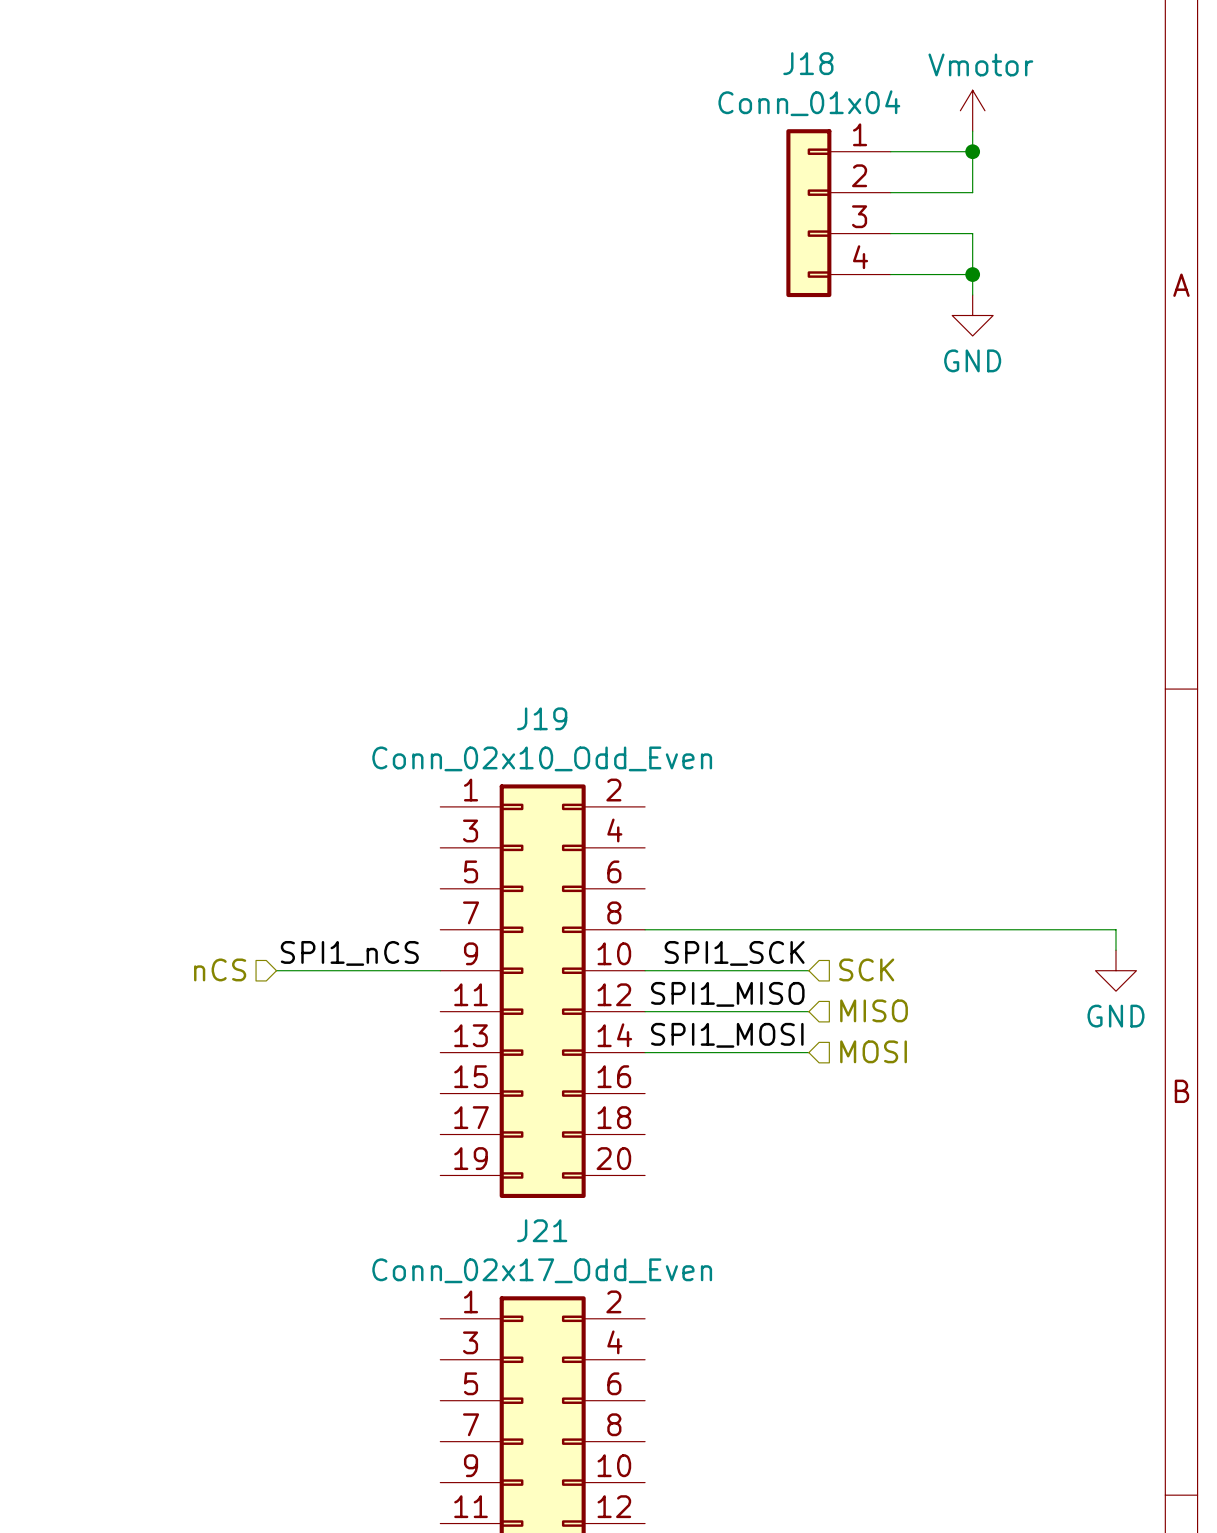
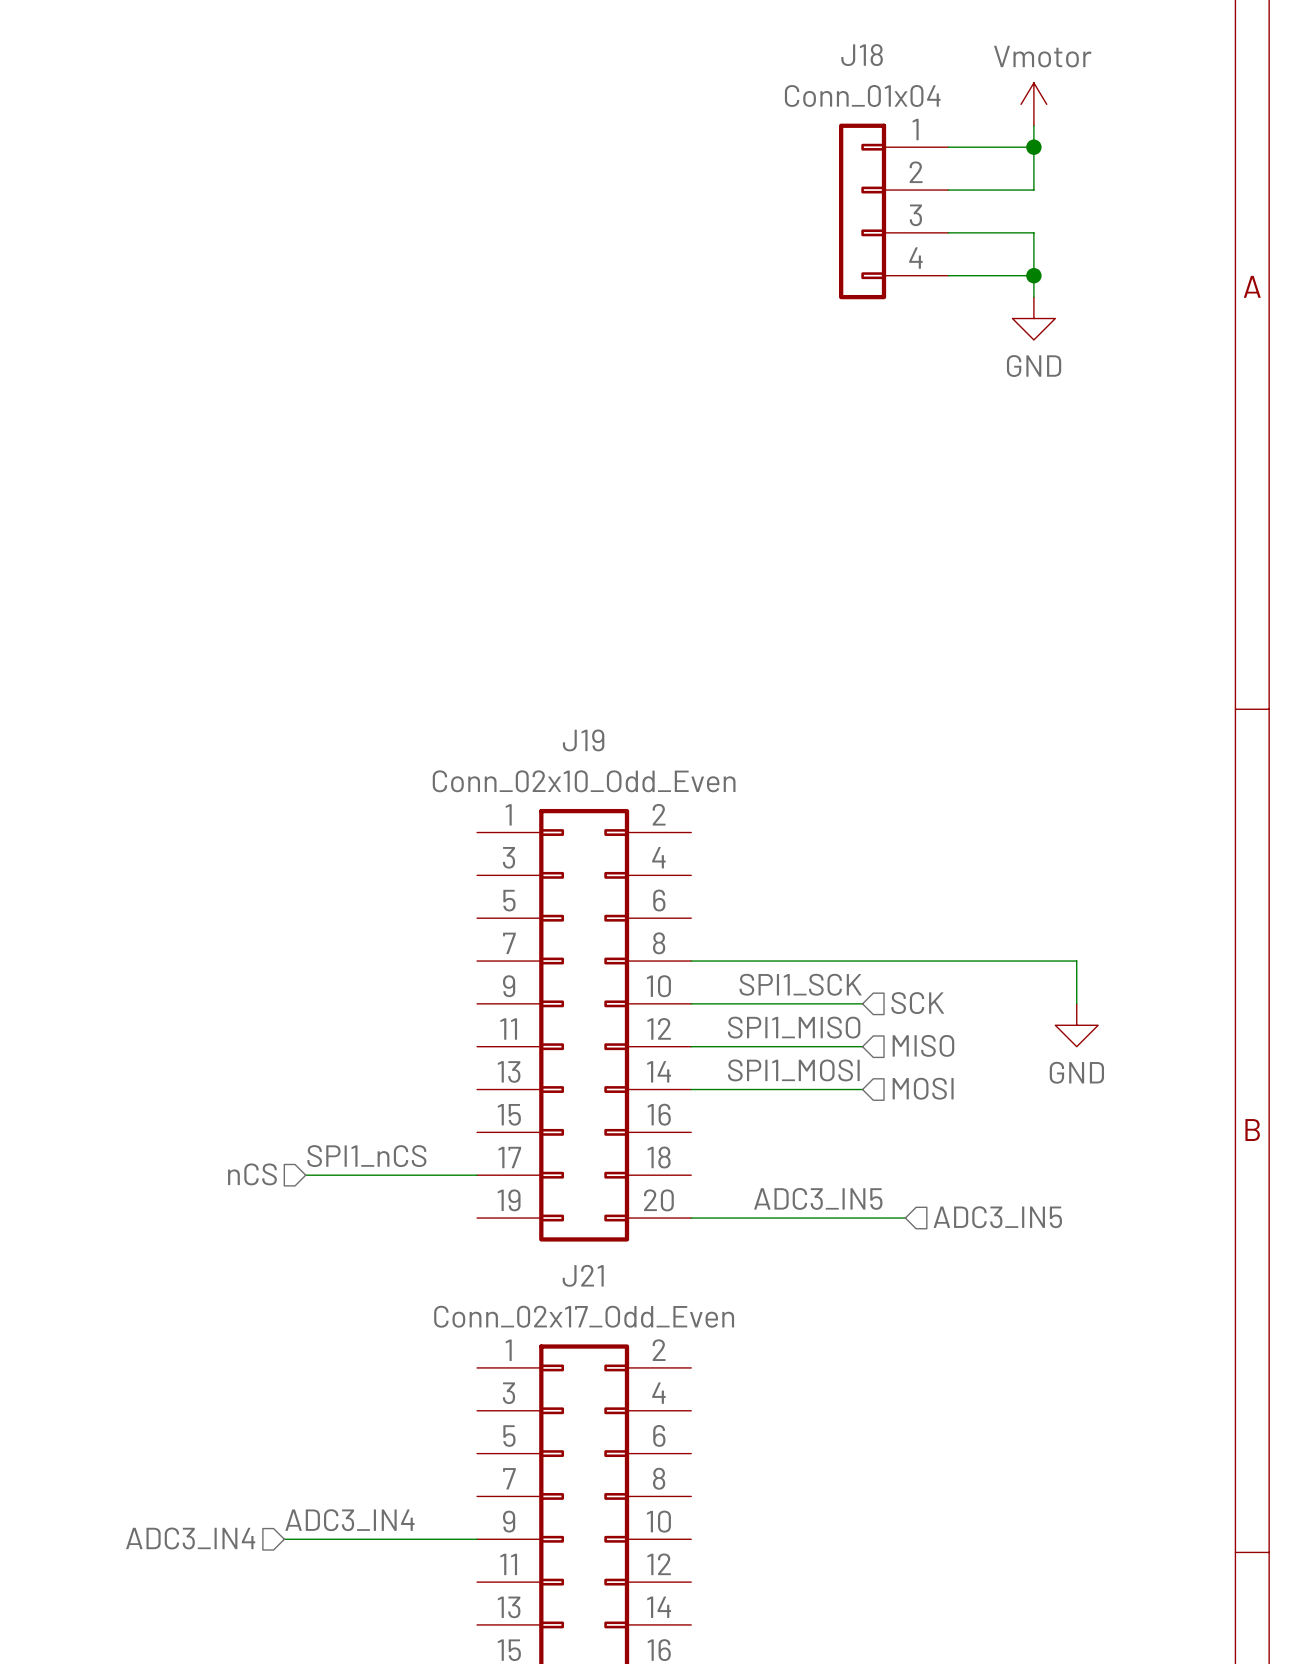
wire: (1013, 929) (1115, 929) (1115, 950) -> (1076, 961) (1076, 1003)
label position: SPI1_nCS (349, 953) -> SPI1_nCS (366, 1156)
hierarchical label position: nCS (220, 969) -> nCS (252, 1174)
wire: (276, 970) (440, 970) -> (305, 1175) (477, 1175)
power symbol position: GND (1115, 970) -> GND (1076, 1025)
label: none -> ADC3_IN5 (818, 1198)
wire: none -> (691, 1218) (905, 1218)
hierarchical label: none -> ADC3_IN5 (997, 1217)
label: none -> ADC3_IN4 (349, 1520)
hierarchical label: none -> ADC3_IN4 (190, 1538)
wire: none -> (284, 1539) (477, 1539)

